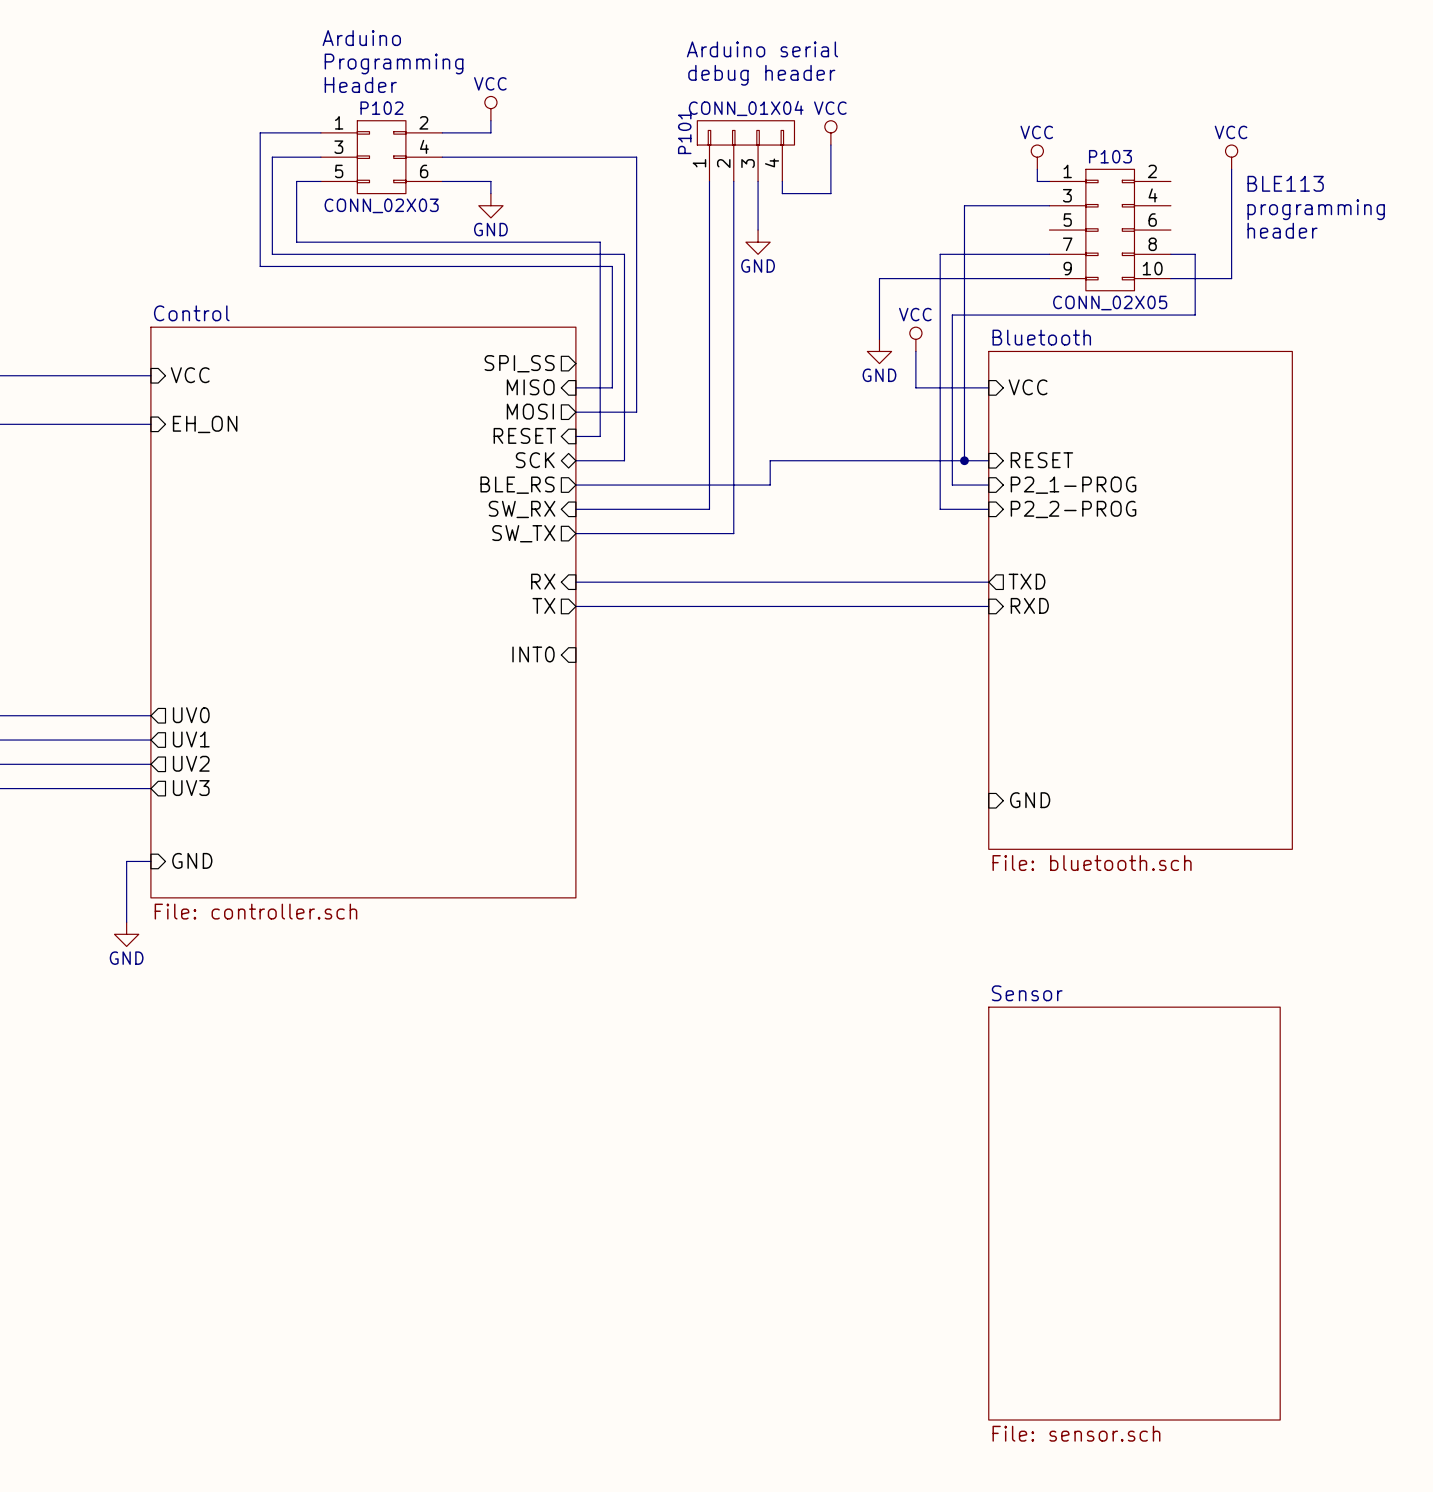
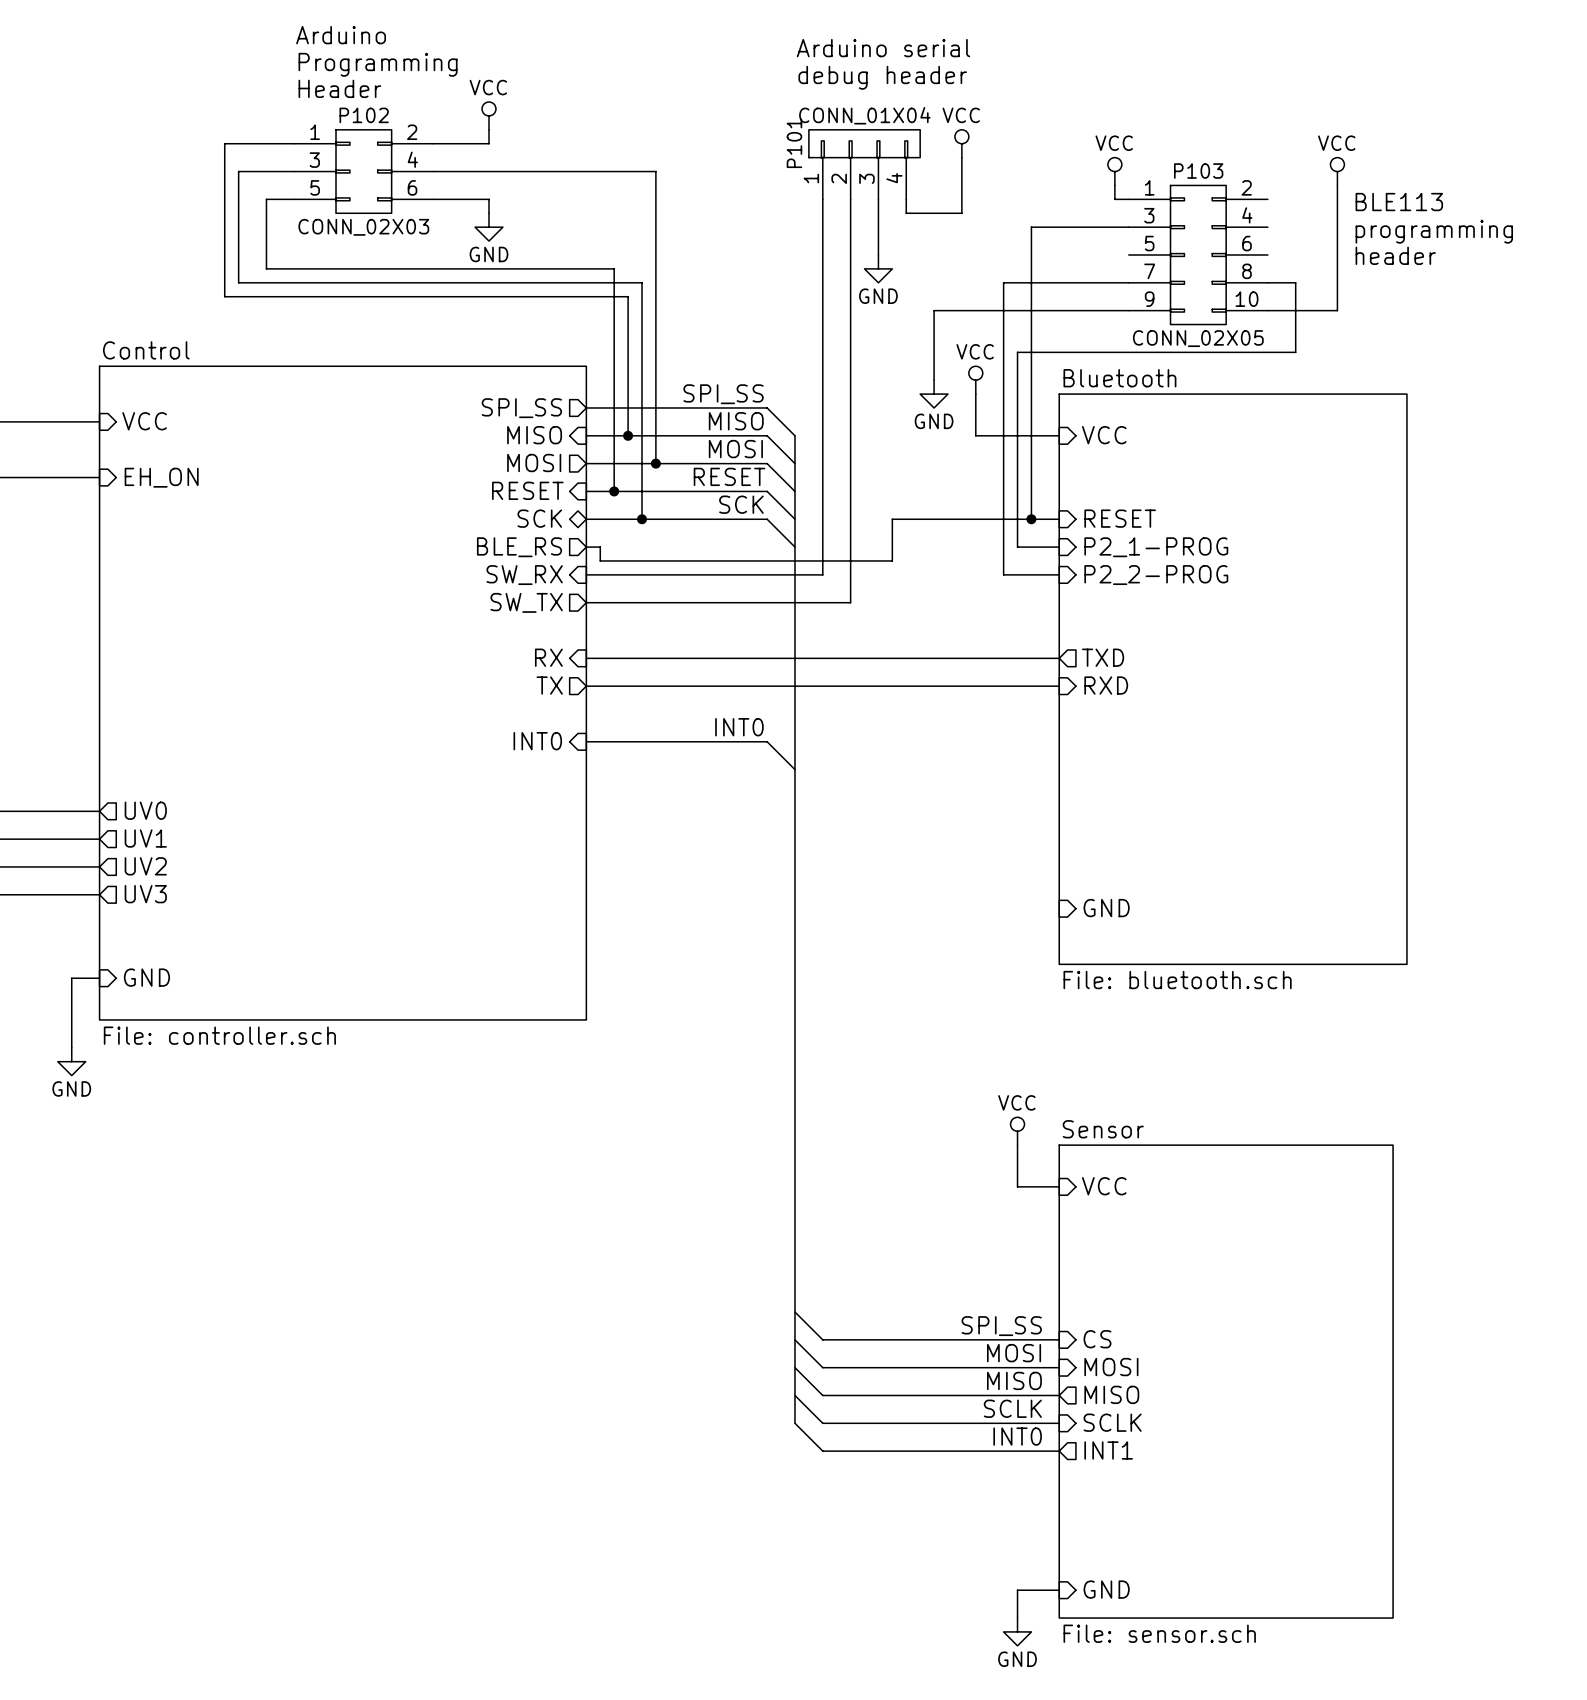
text position: Arduino serial (762, 49) -> Arduino serial (883, 48)
text position: debug header (761, 75) -> debug header (882, 77)
power symbol position: VCC (830, 132) -> VCC (961, 143)
wire: none -> (961, 157) (961, 213) (906, 213) (906, 199)
P101 position: (745, 151) -> (864, 164)
wire: (709, 181) (709, 509) -> (822, 213) (822, 574) (739, 574)
wire: (733, 181) (733, 533) -> (850, 199) (850, 602) (767, 602)
wire: (758, 181) (758, 230) -> none
wire: (782, 193) (830, 193) -> (878, 254) (878, 213)
power symbol position: GND (758, 242) -> GND (878, 268)
label: none -> SPI_SS (723, 394)
wire: none -> (586, 407) (767, 407) (794, 435)
label: none -> MISO (736, 421)
wire: none -> (628, 435) (767, 435) (794, 463)
junction: none -> (628, 435)
bus: none -> (794, 435) (794, 1423)
label: none -> MOSI (735, 449)
wire: none -> (655, 463) (767, 463) (794, 491)
junction: none -> (655, 463)
label: none -> RESET (729, 476)
wire: none -> (614, 491) (767, 491) (794, 519)
junction: none -> (614, 491)
label: none -> SCK (741, 504)
wire: none -> (641, 519) (767, 519) (794, 547)
junction: none -> (641, 519)
wire: (843, 460) (770, 460) (770, 485) (588, 485) -> (892, 519) (892, 560) (600, 560) (600, 547)
label: none -> INT0 (739, 727)
wire: none -> (586, 741) (767, 741) (794, 769)
power symbol: none -> VCC (1017, 1131)
wire: none -> (1017, 1145) (1017, 1186) (1059, 1186)
sheet pin: none -> VCC (1104, 1186)
wire: none -> (794, 1312) (822, 1339) (1059, 1339)
label: none -> SPI_SS (1001, 1326)
sheet pin: none -> CS (1097, 1339)
wire: none -> (794, 1339) (822, 1367) (1059, 1367)
label: none -> MOSI (1014, 1353)
sheet pin: none -> MOSI (1111, 1367)
wire: none -> (794, 1367) (822, 1395) (1059, 1395)
label: none -> MISO (1014, 1380)
wire: none -> (794, 1395) (822, 1423) (1059, 1423)
sheet pin: none -> MISO (1111, 1394)
label: none -> SCLK (1012, 1408)
sheet pin: none -> SCLK (1112, 1422)
wire: none -> (794, 1423) (822, 1451) (1059, 1451)
label: none -> INT0 (1017, 1436)
sheet pin: none -> INT1 (1108, 1450)
wire: none -> (1059, 1590) (1017, 1590) (1017, 1618)
sheet pin: none -> GND (1106, 1589)
power symbol: none -> GND (1017, 1631)

